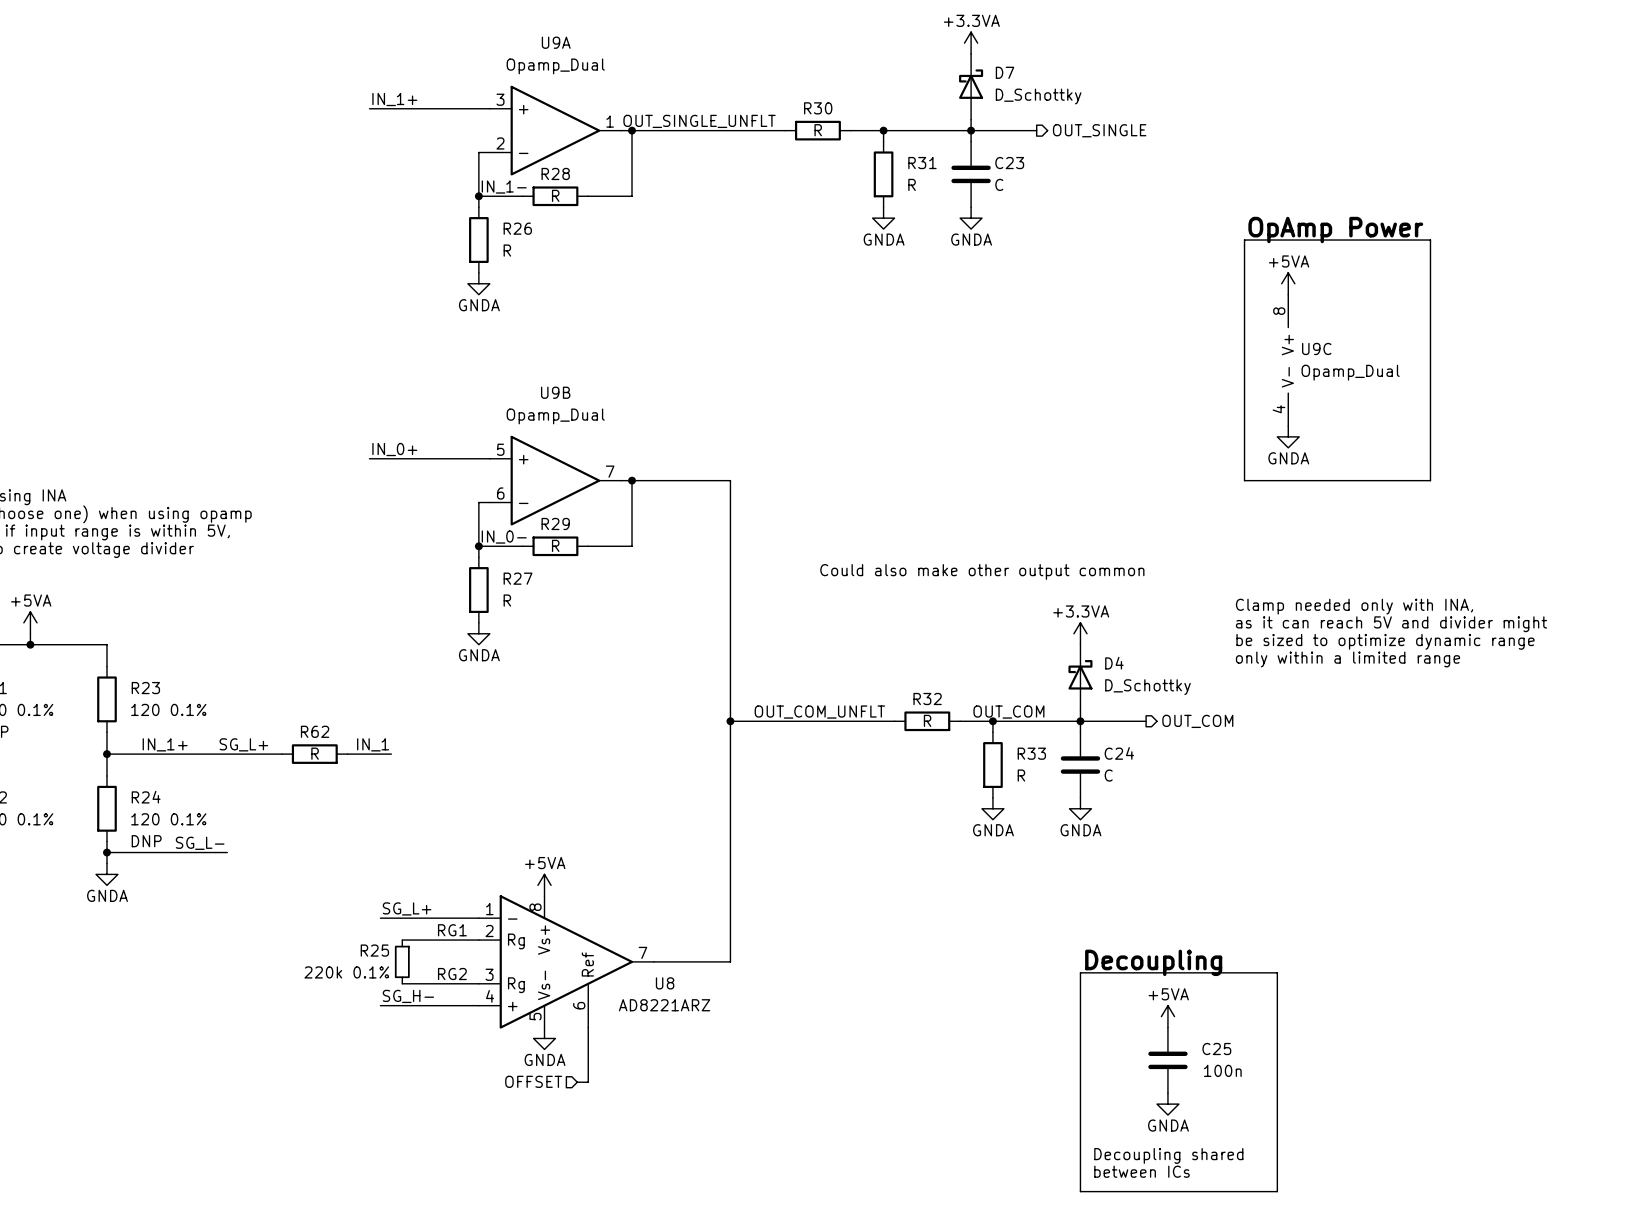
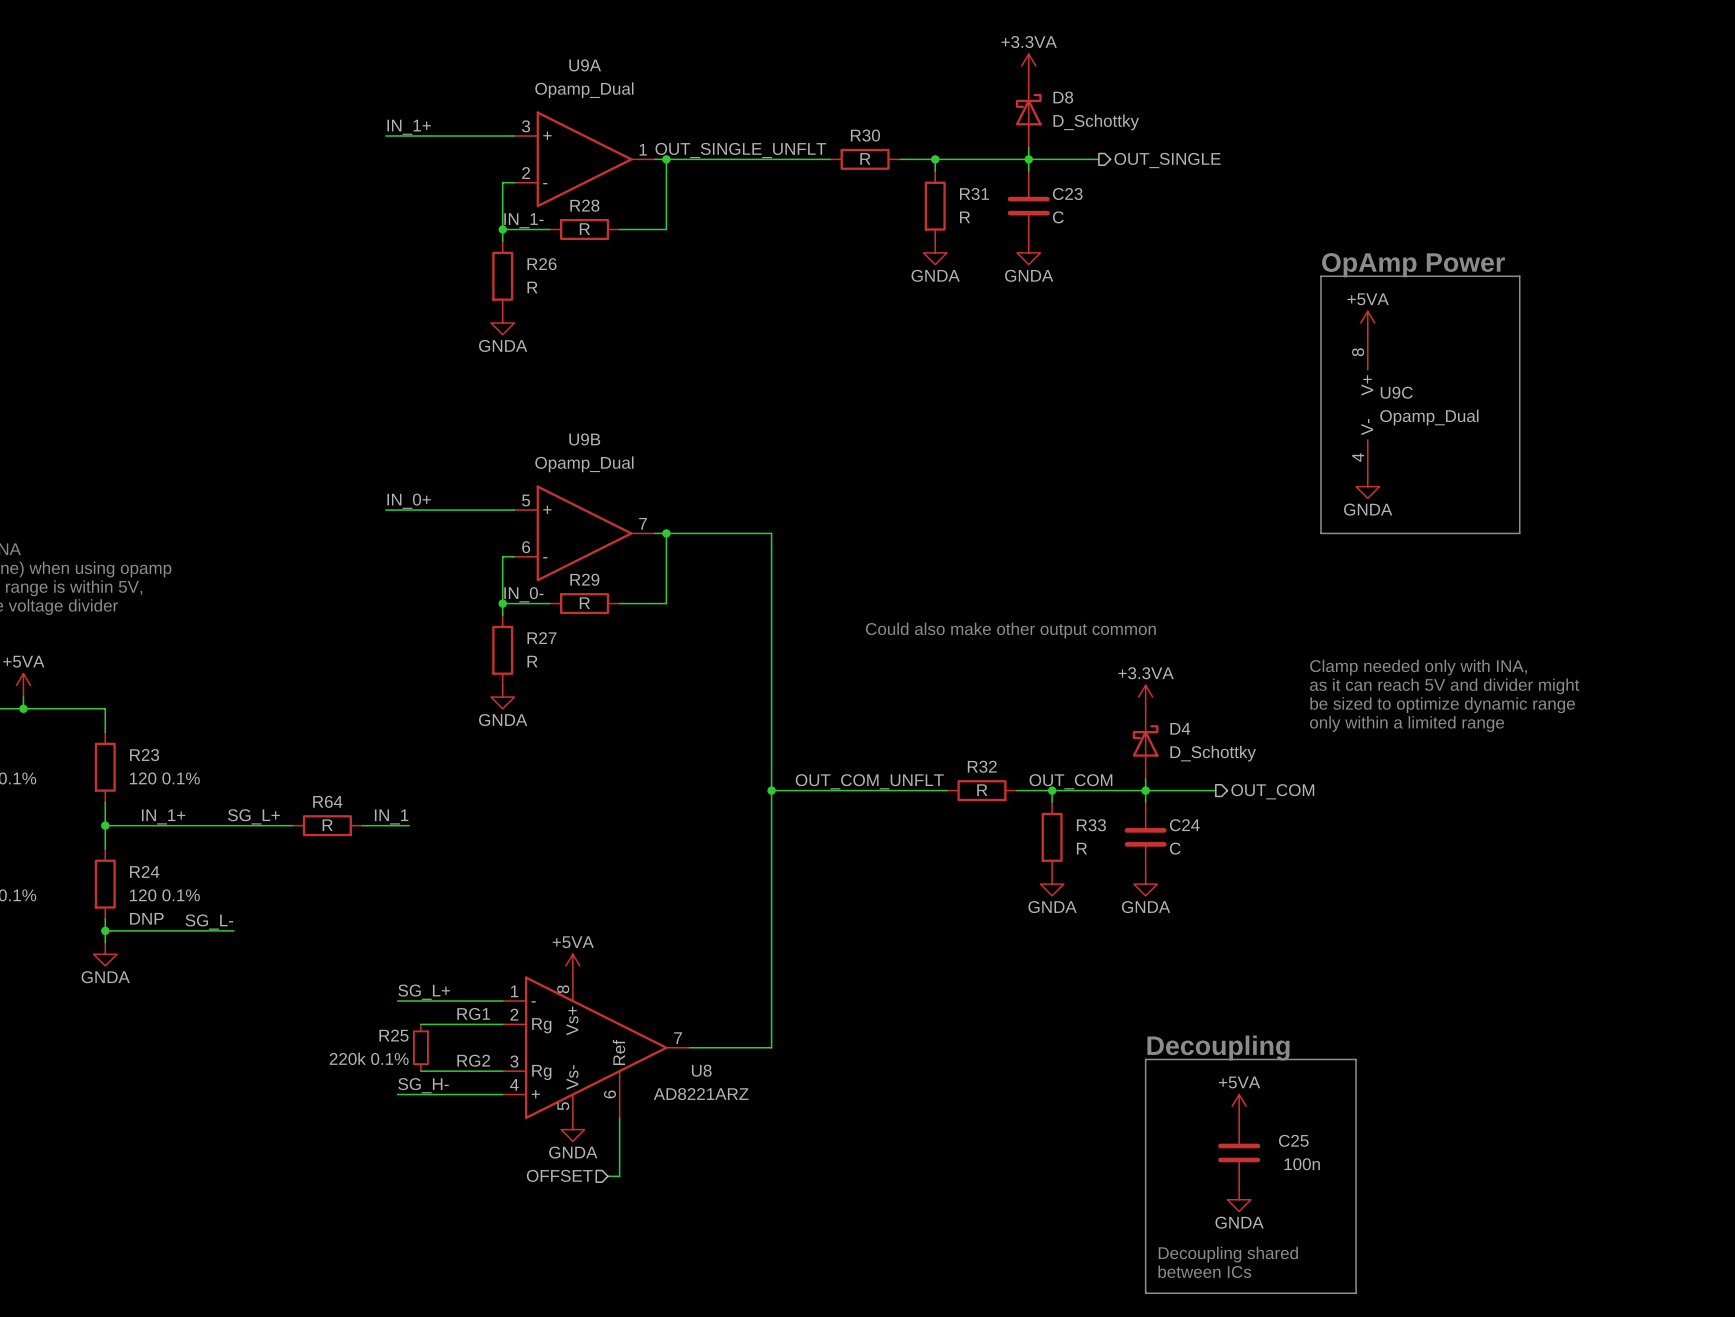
D7 name: D7 (1005, 72) -> D8 (1063, 97)
R62 name: R62 (315, 731) -> R64 (327, 801)

